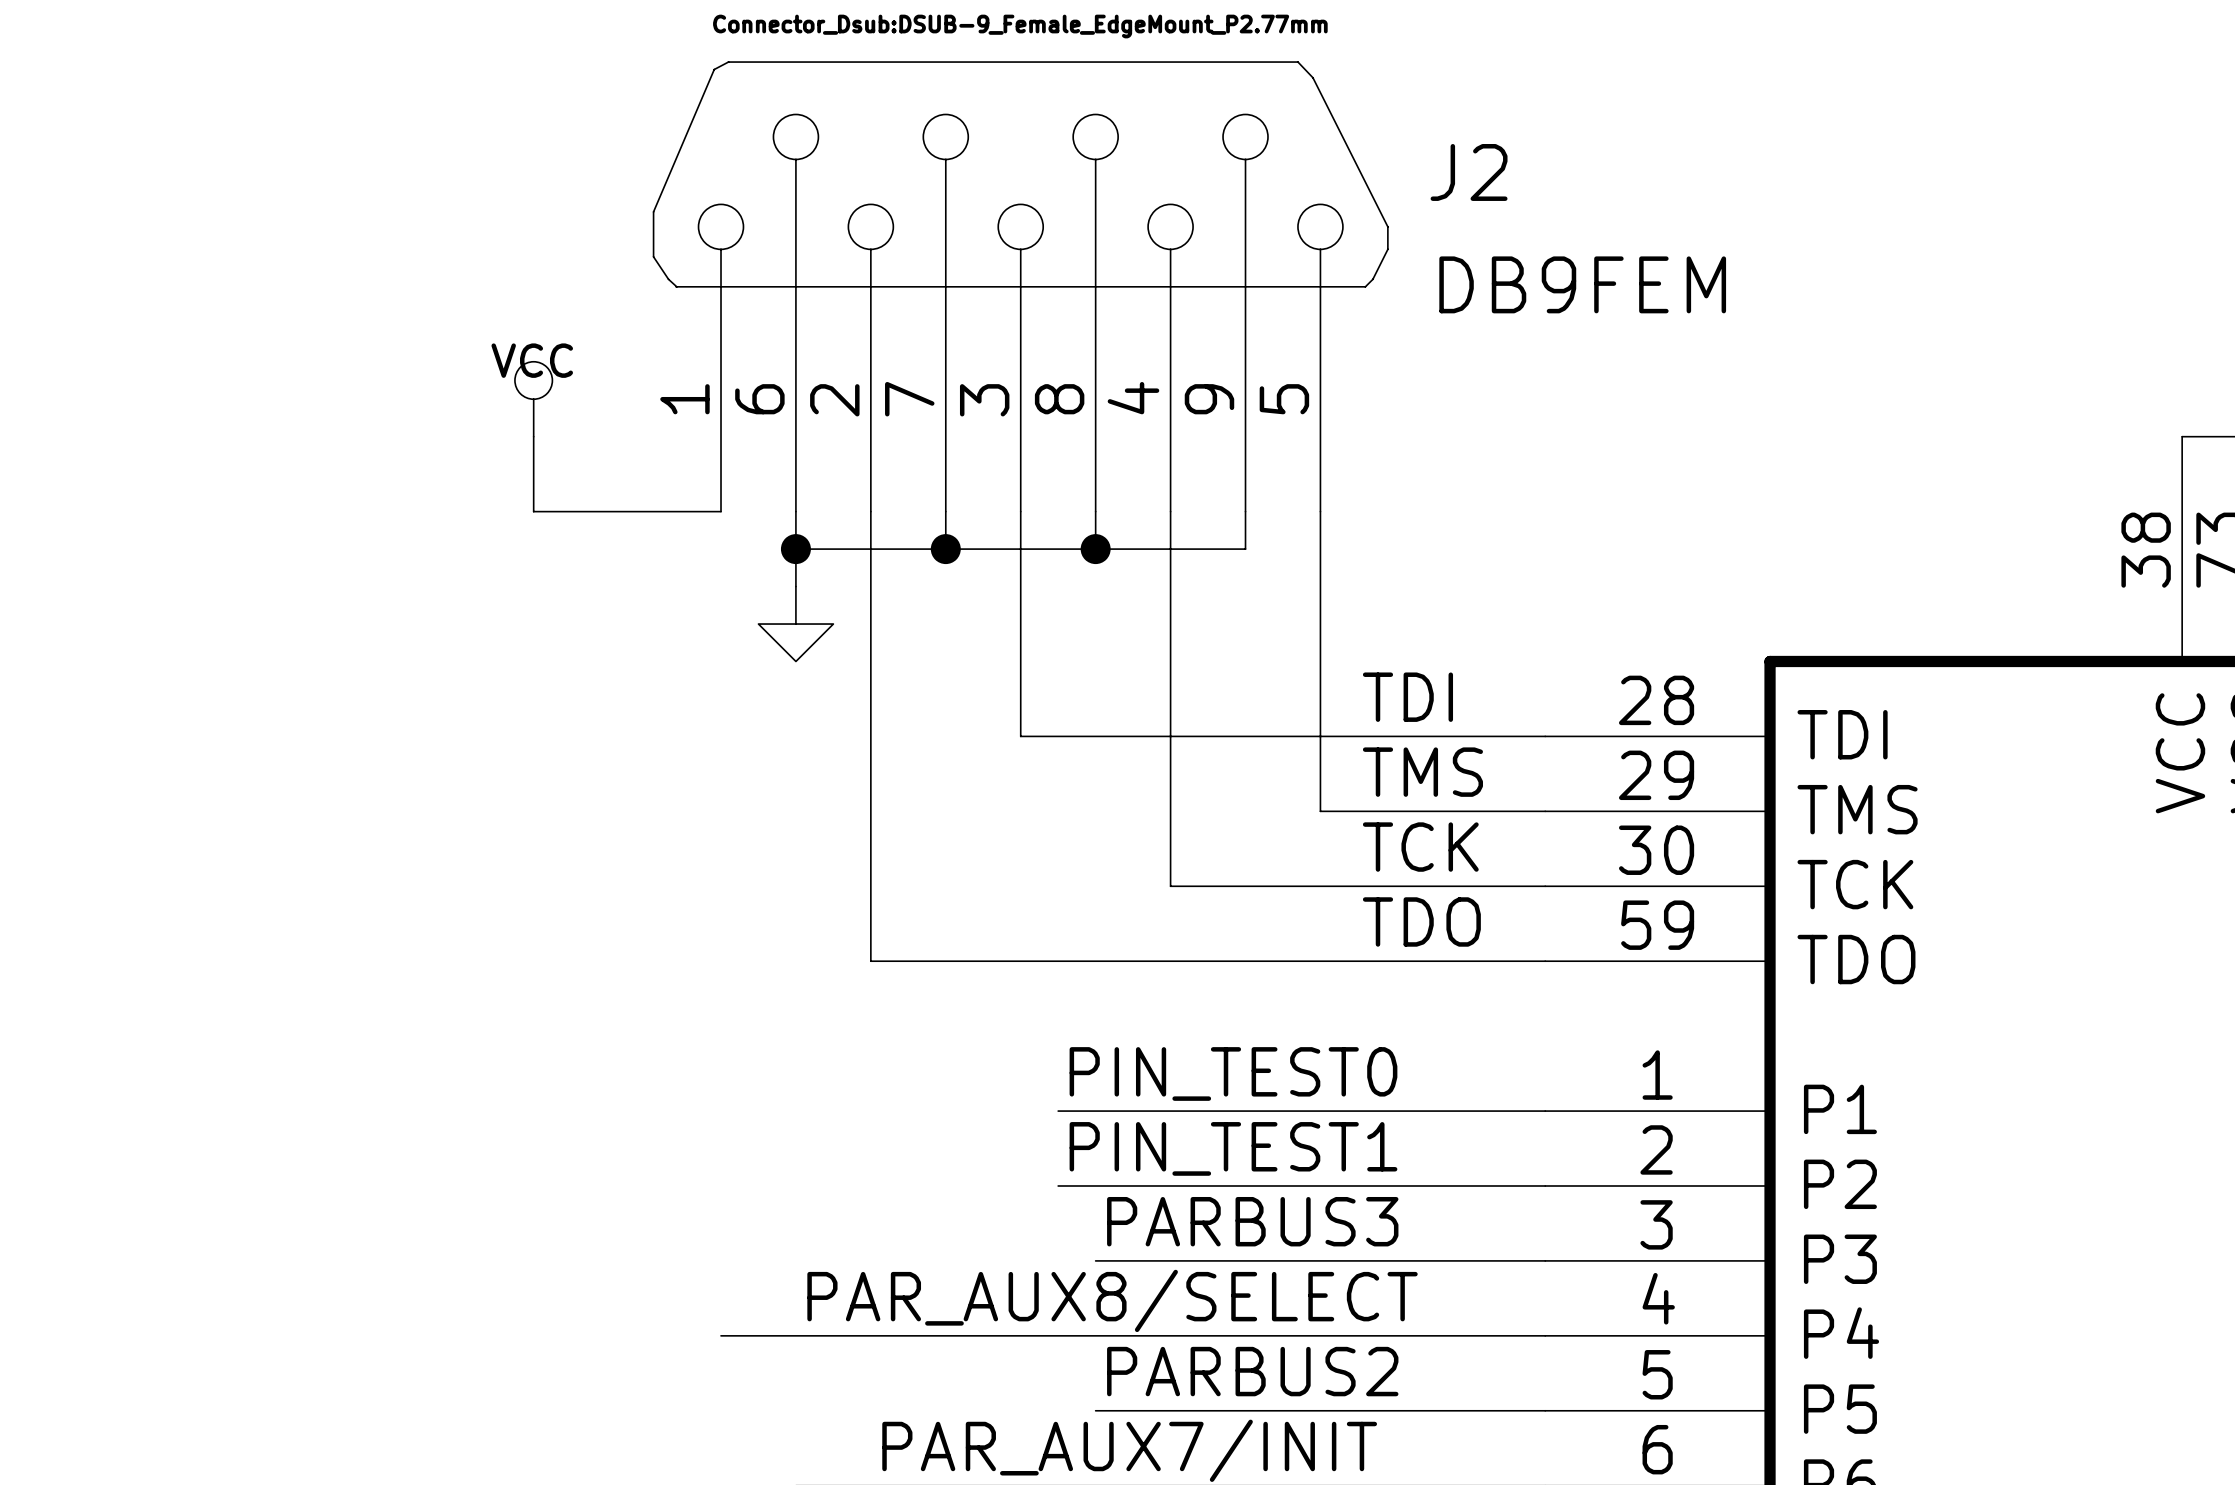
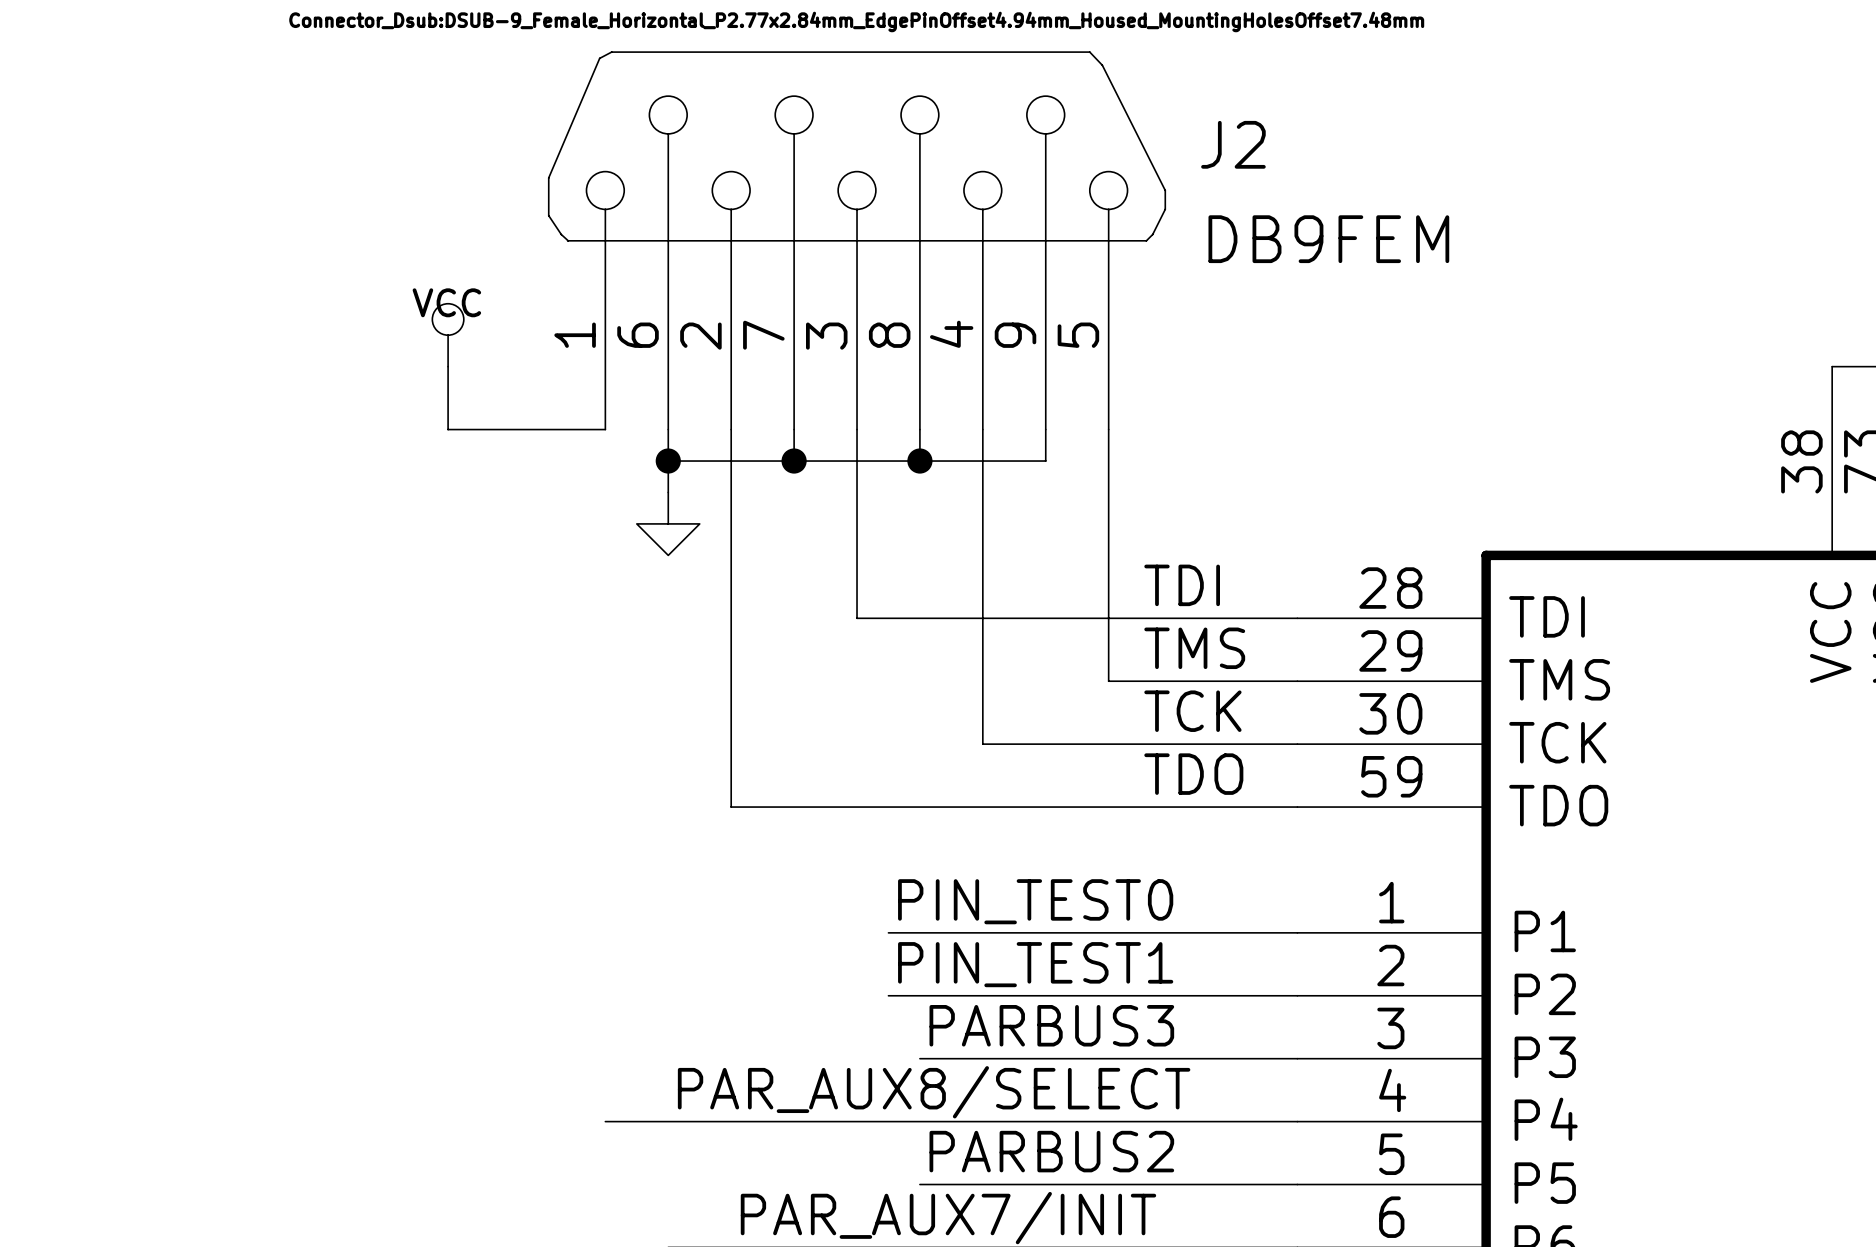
J2 text: Connector_Dsub:DSUB-9_Female_EdgeMount_P2.77mm (1020, 26) -> Connector_Dsub:DSUB-9_Female_Horizontal_P2.77x2.84mm_EdgePinOffset4.94mm_Housed_MountingHolesOffset7.48mm (856, 21)

